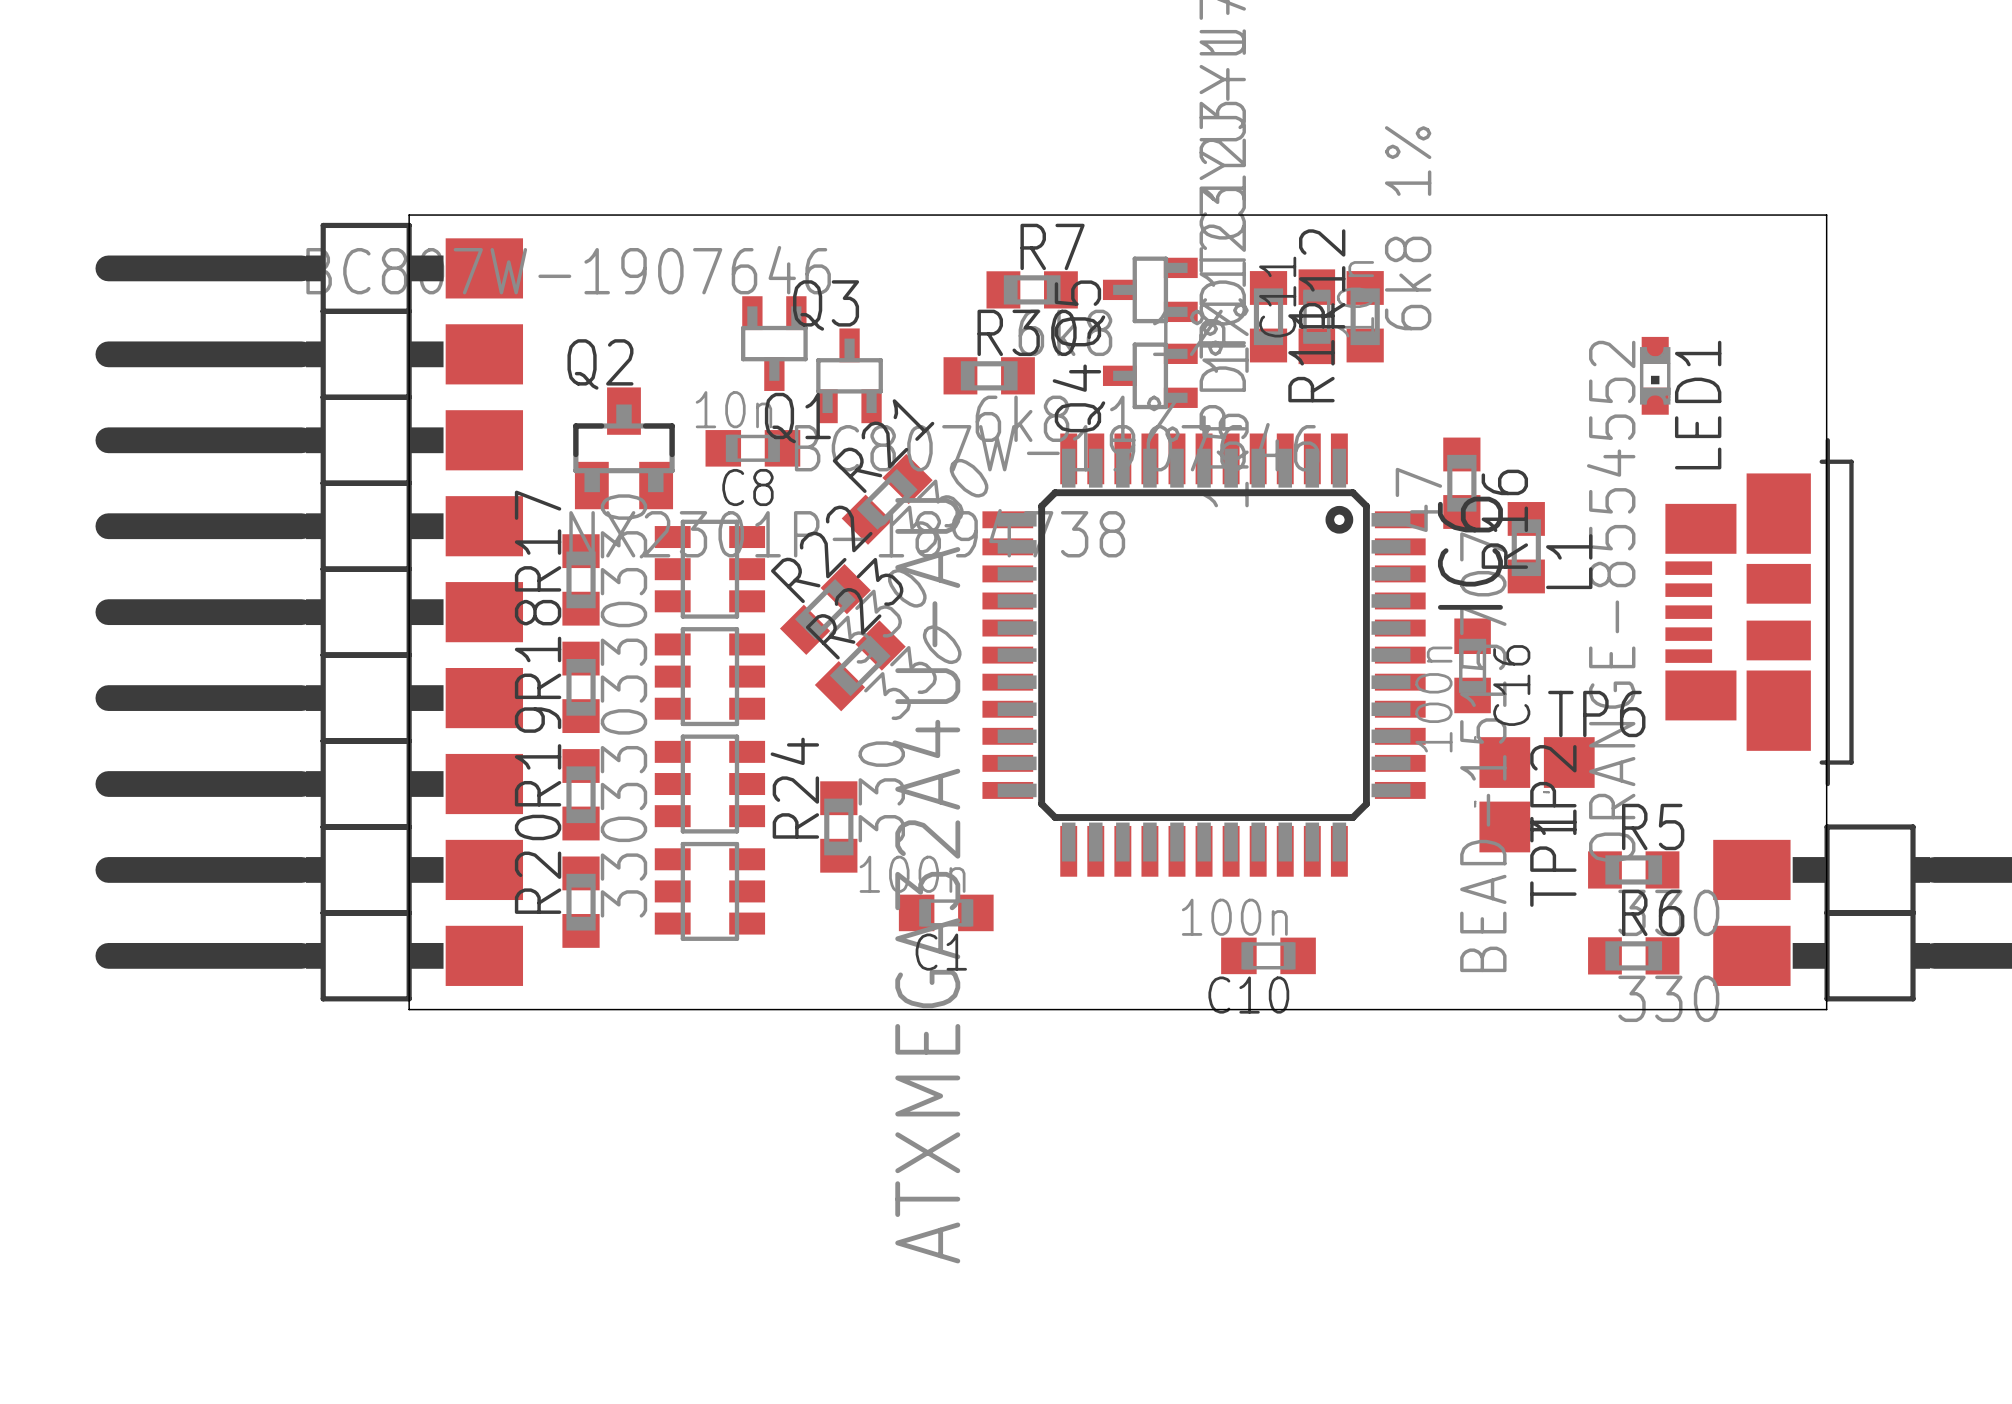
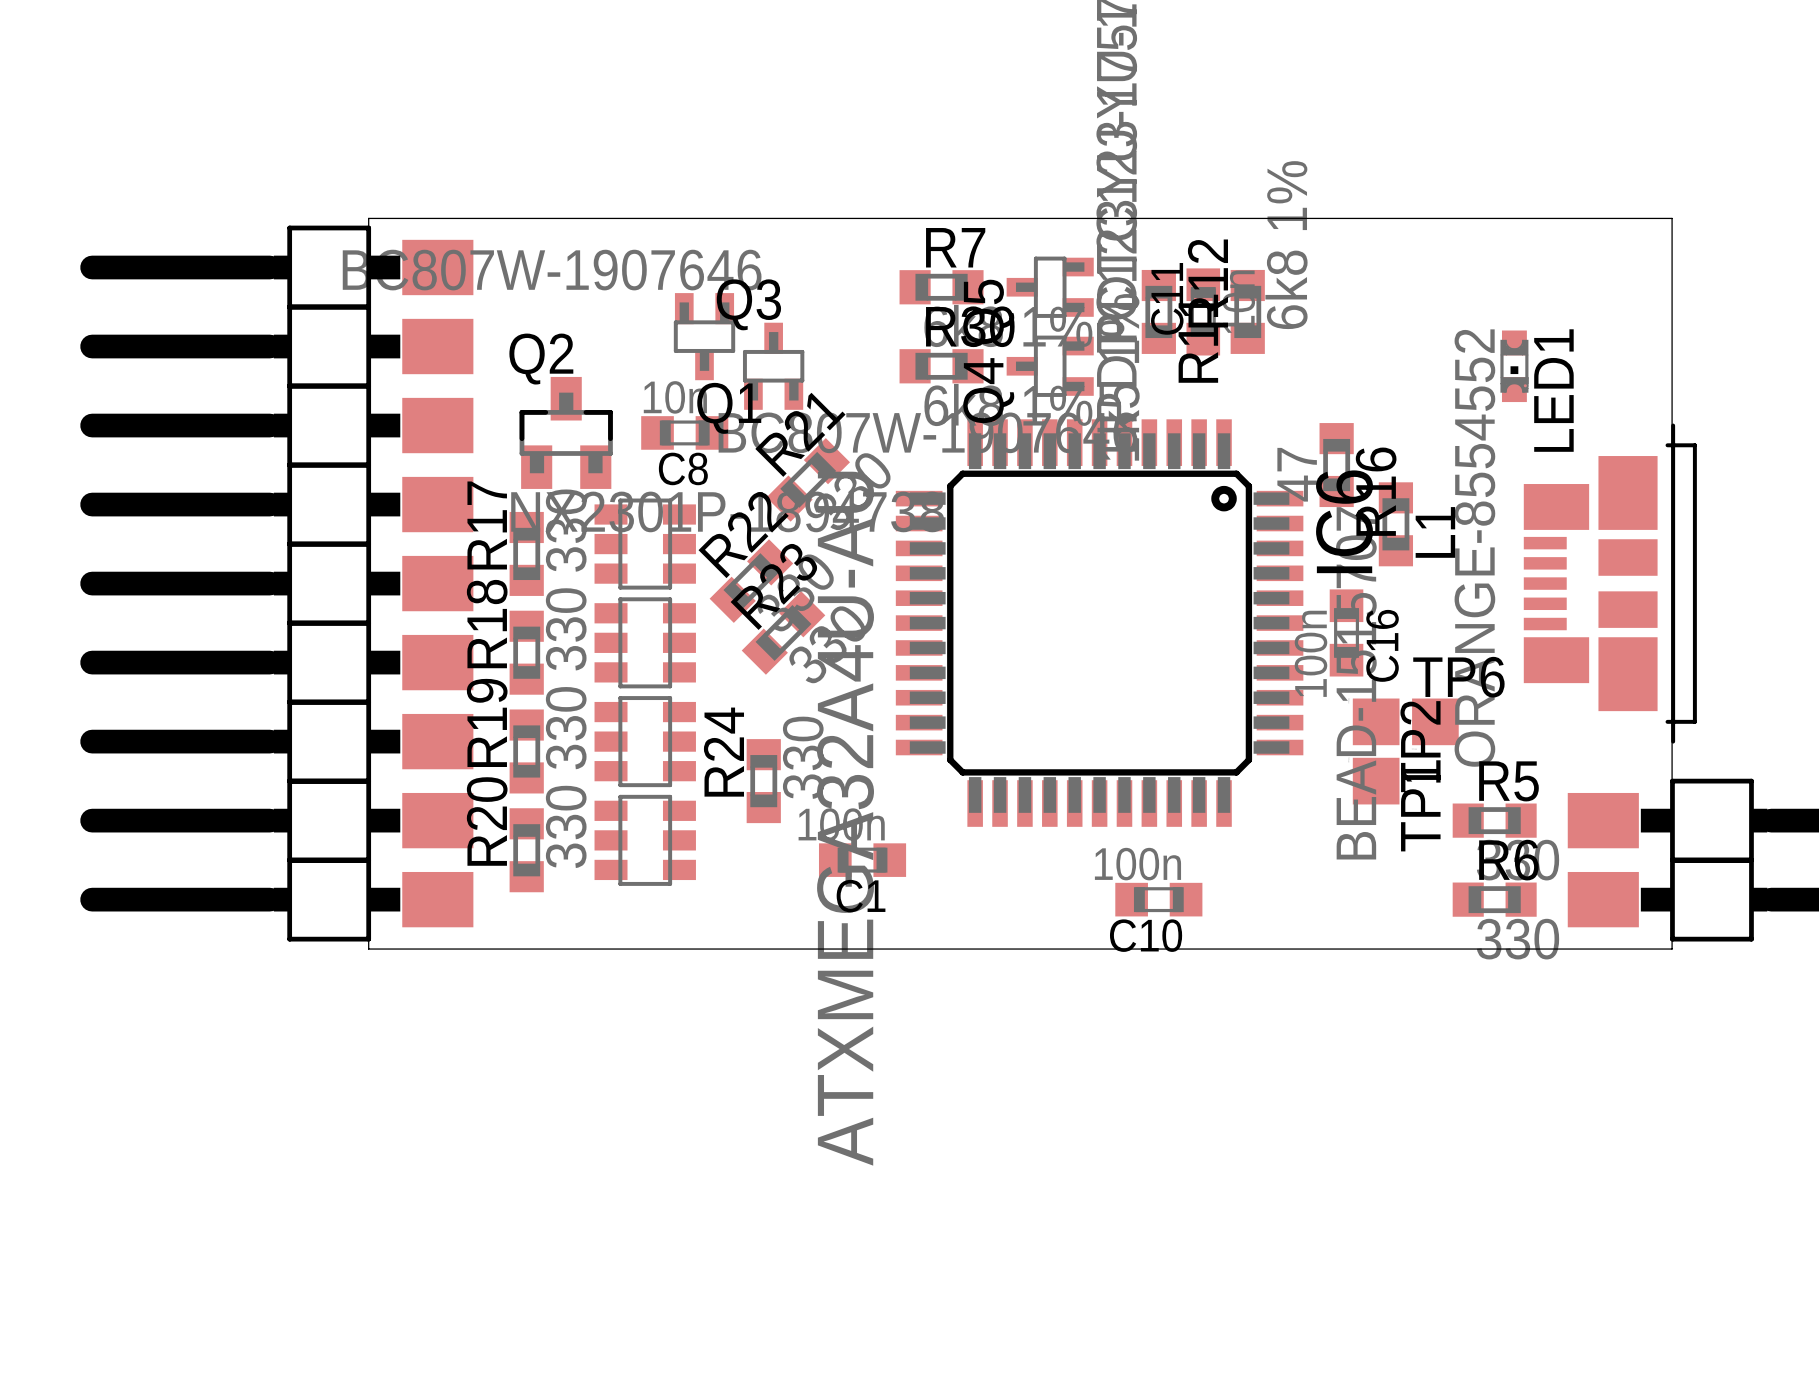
R30 position: (989, 375) -> (941, 366)

